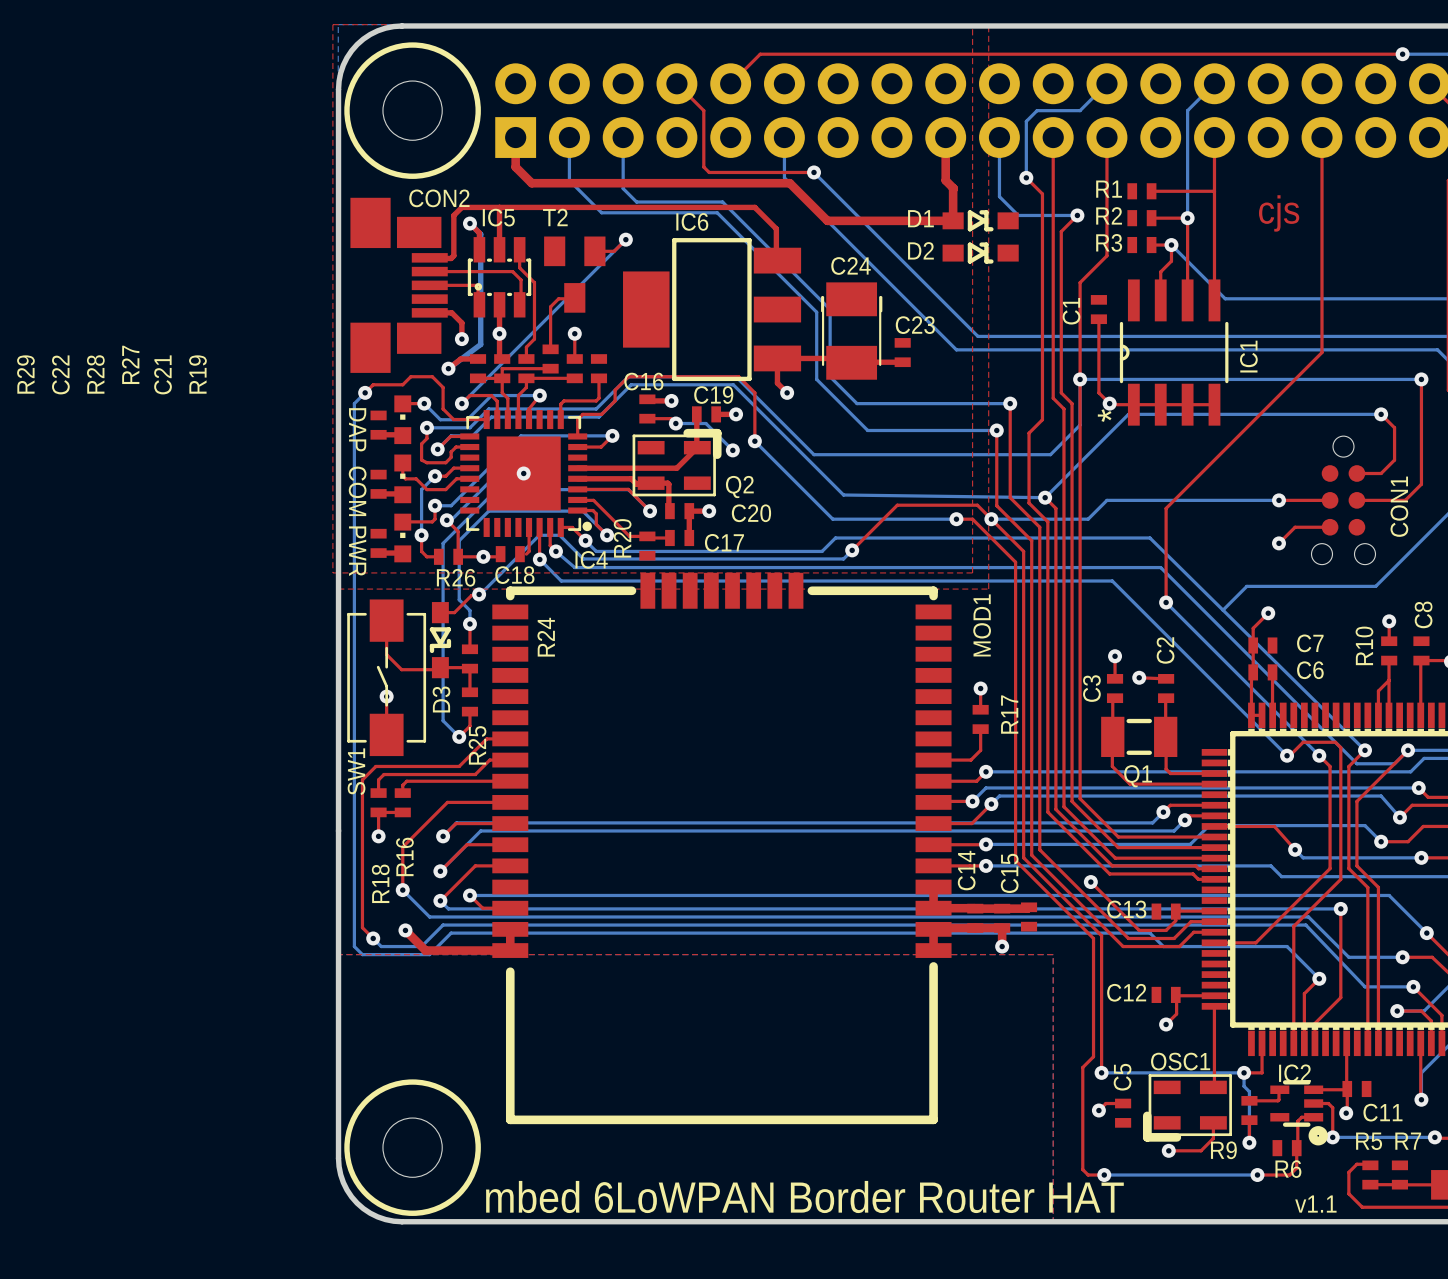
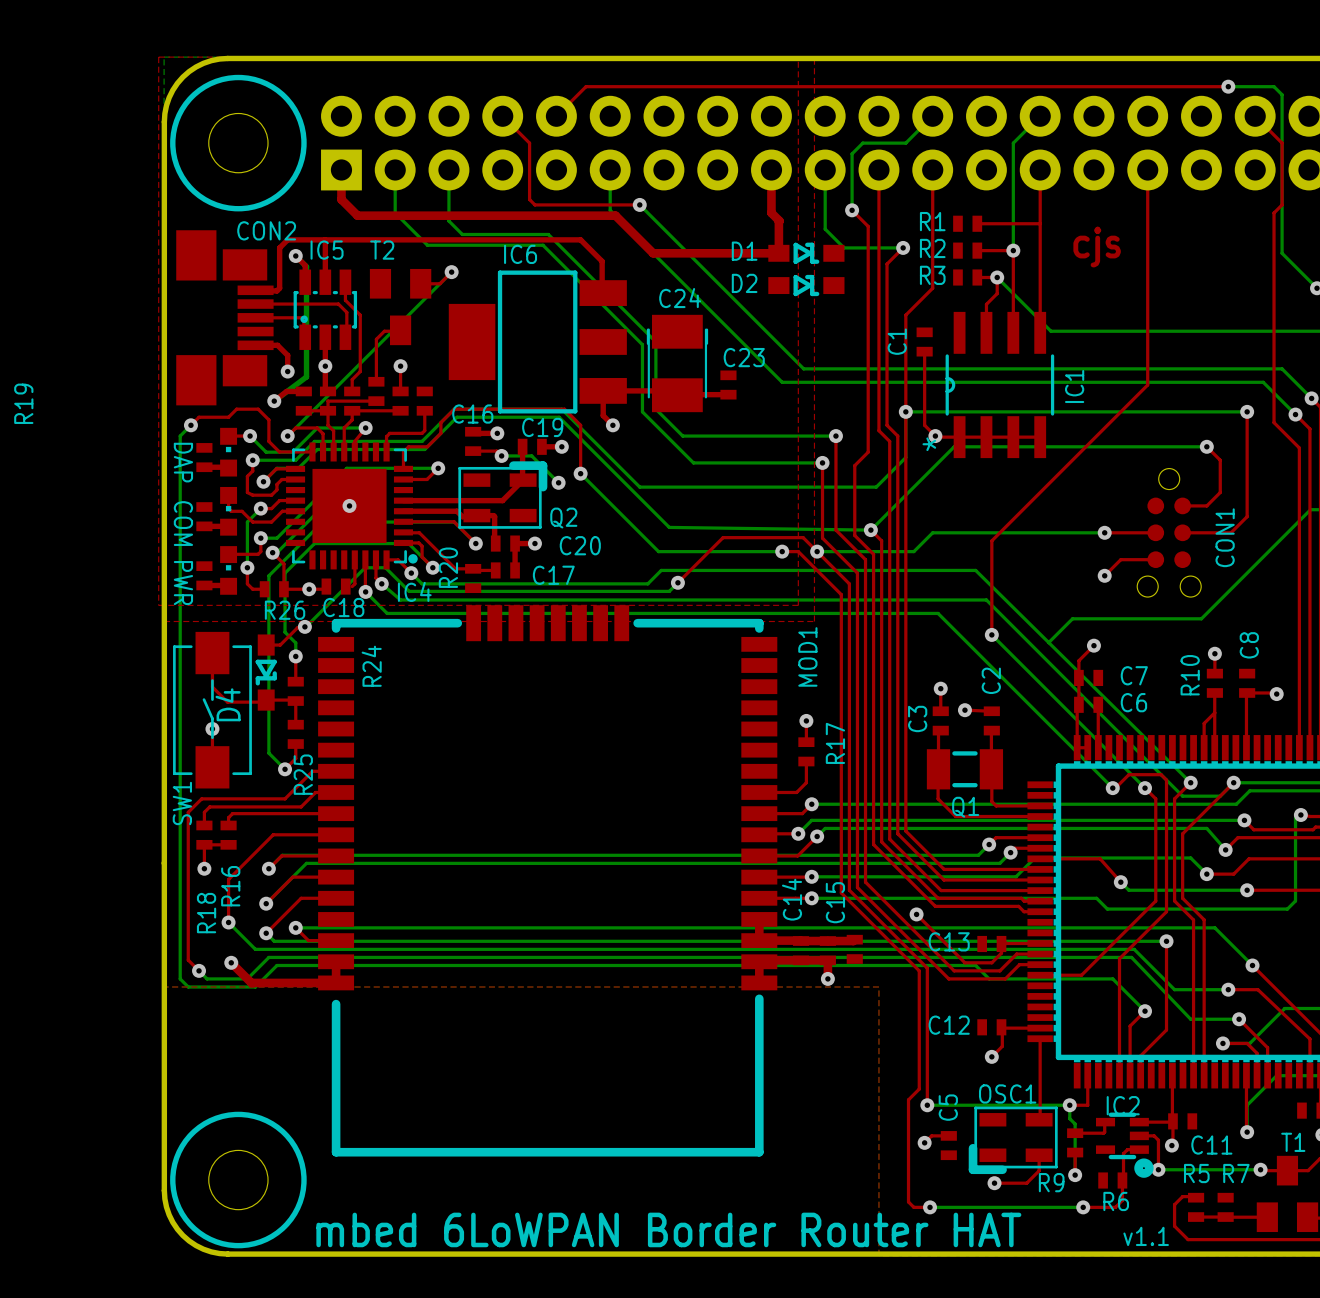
D3 name: D3 (441, 699) -> D4 (228, 704)

